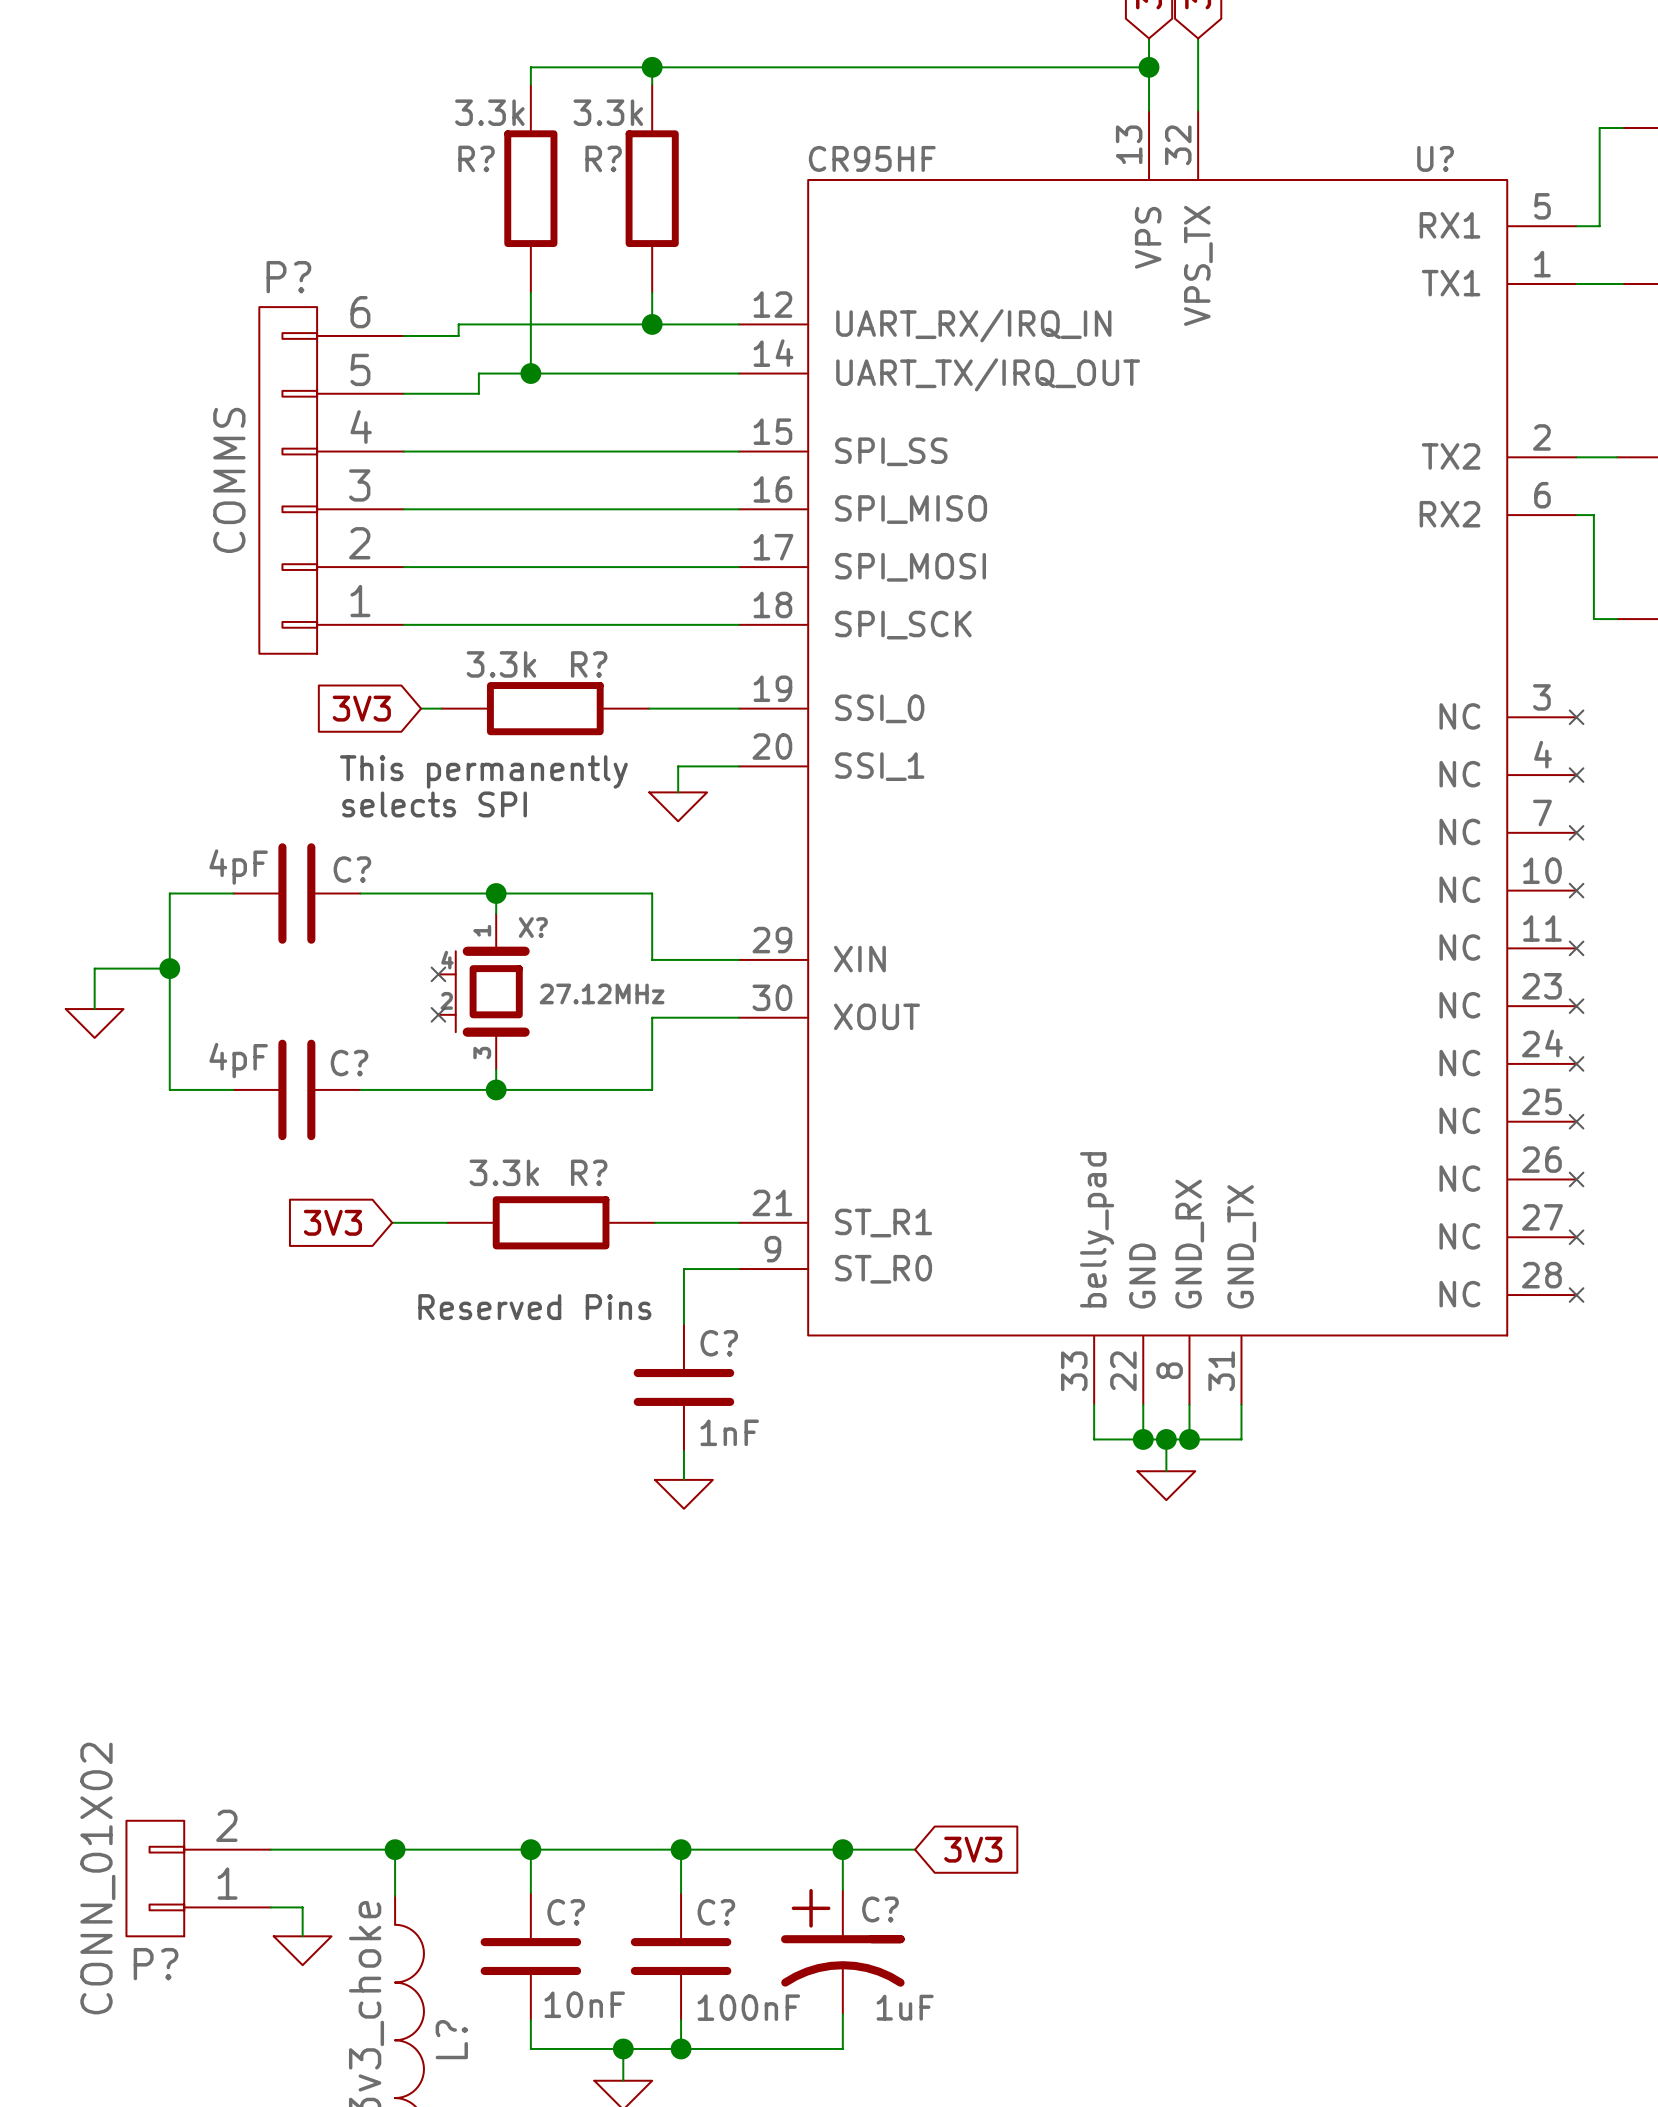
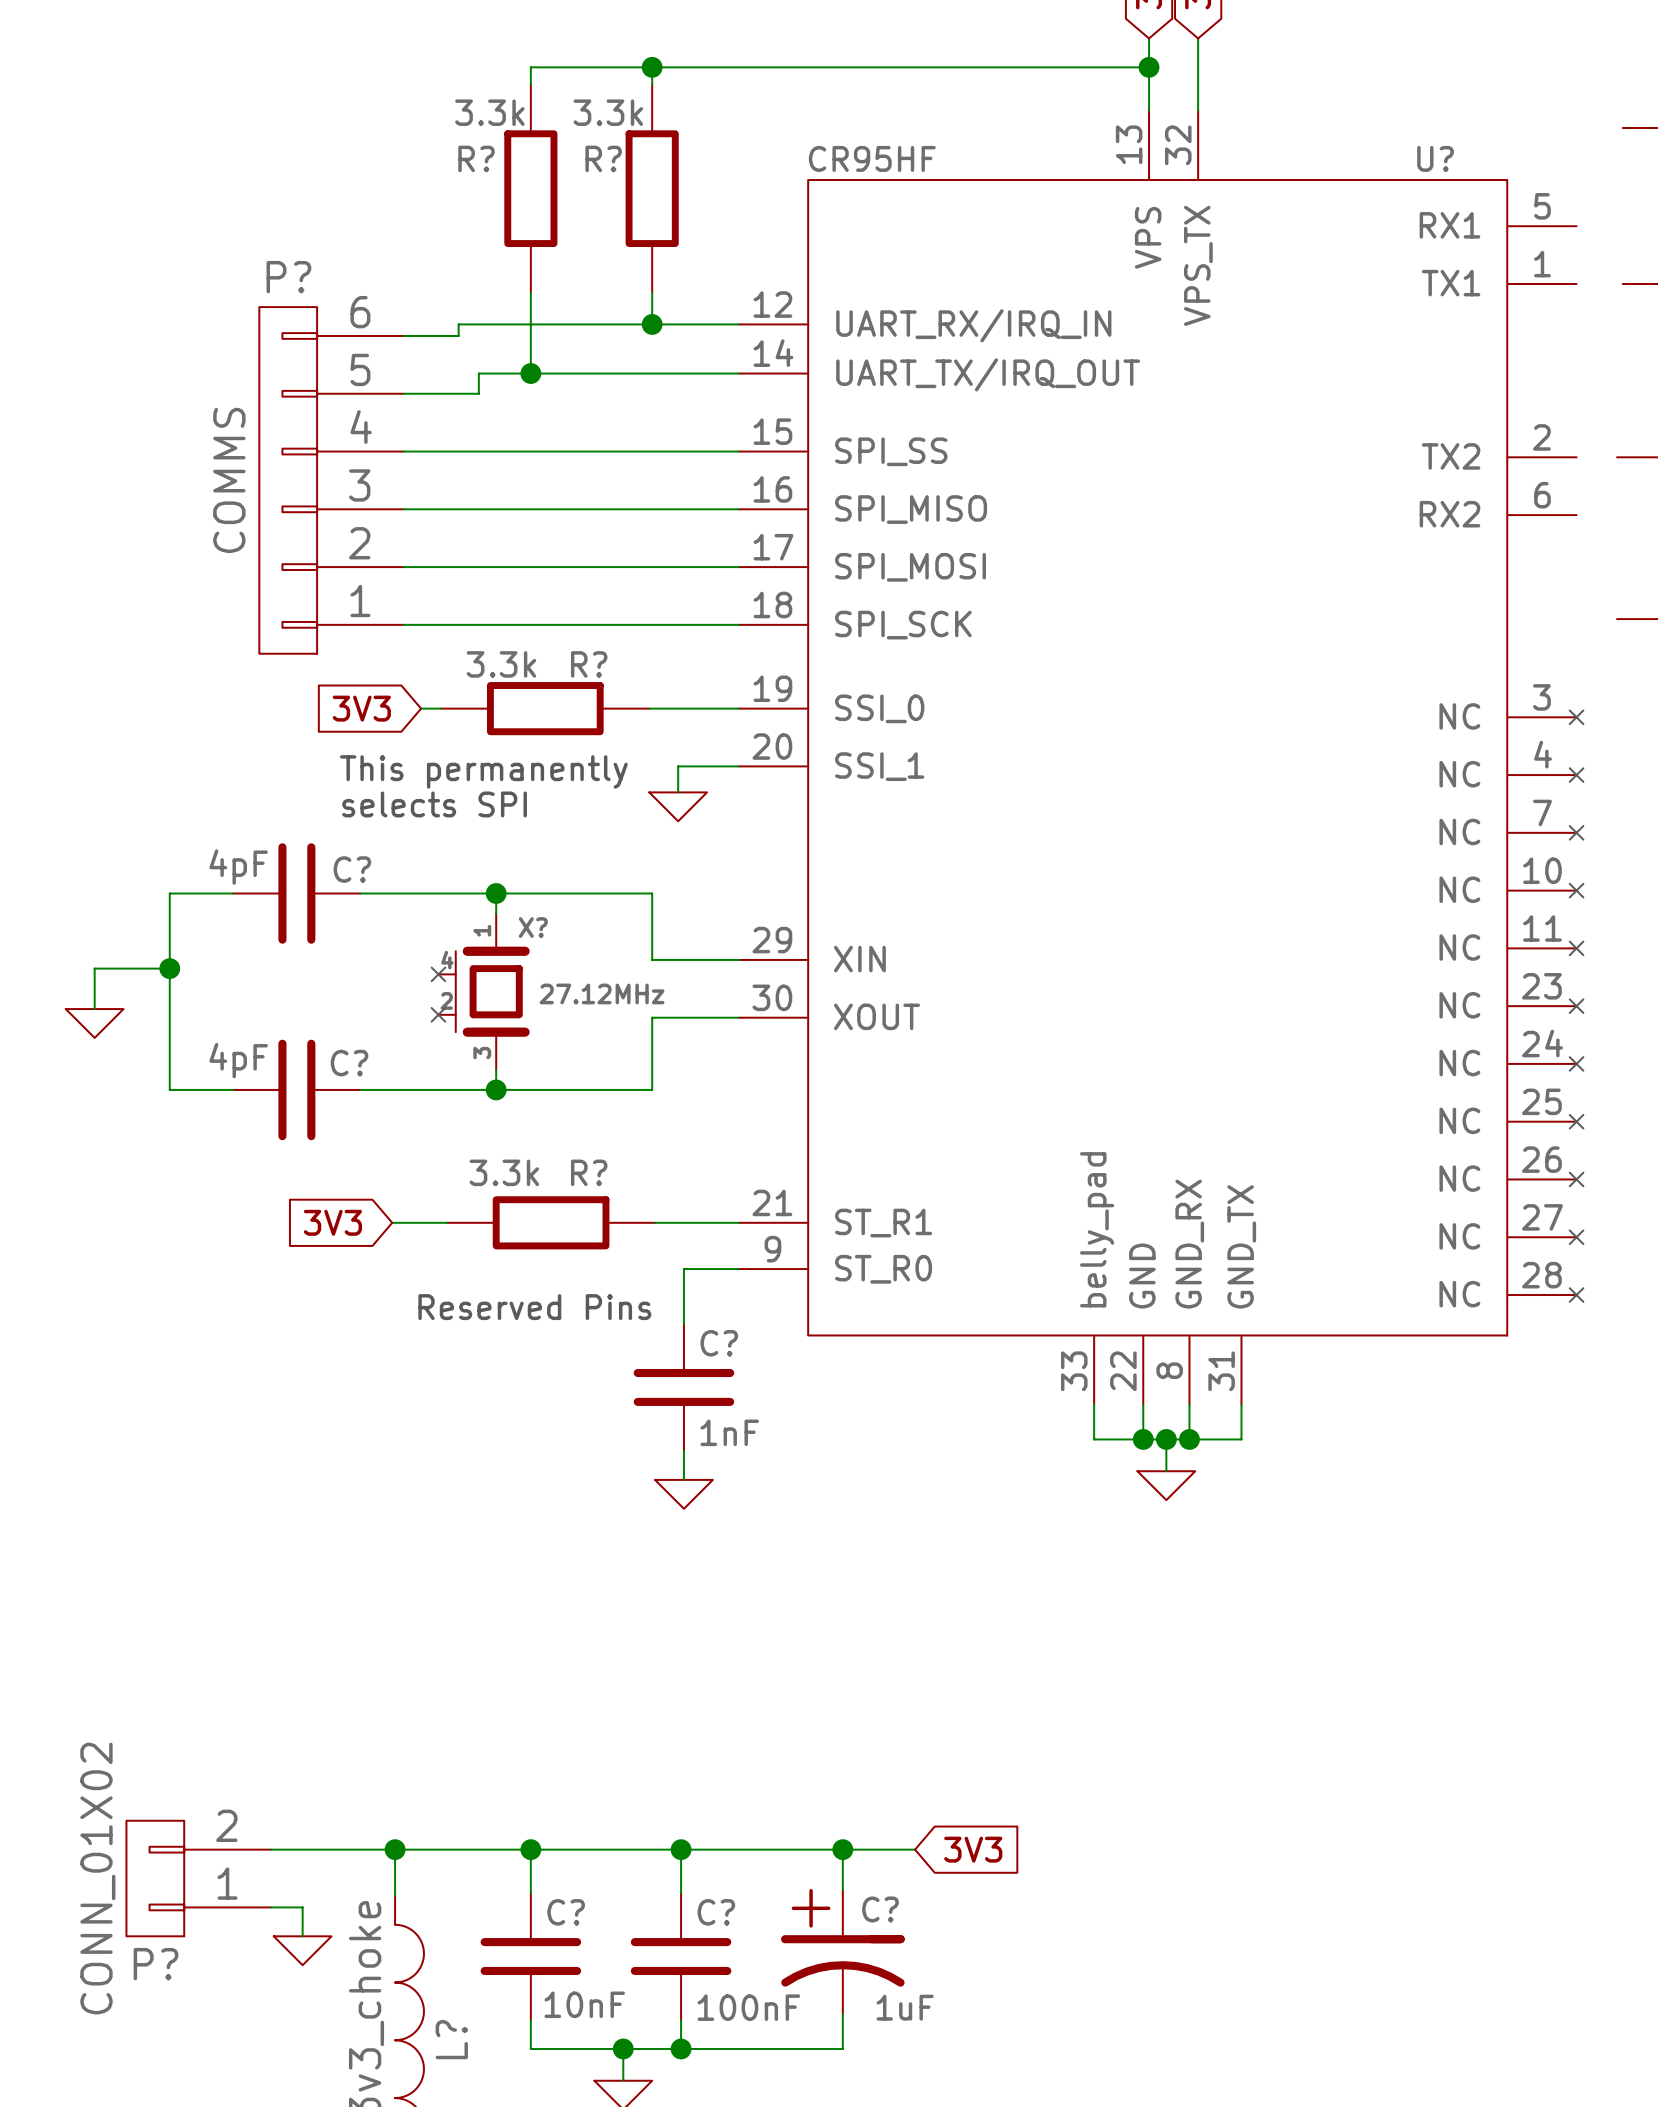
wire: (1622, 128) (1599, 128) (1599, 226) (1576, 226) -> none
wire: (1576, 283) (1622, 283) -> none
wire: (1576, 457) (1617, 457) -> none
wire: (1576, 515) (1593, 515) (1593, 619) (1617, 619) -> none

